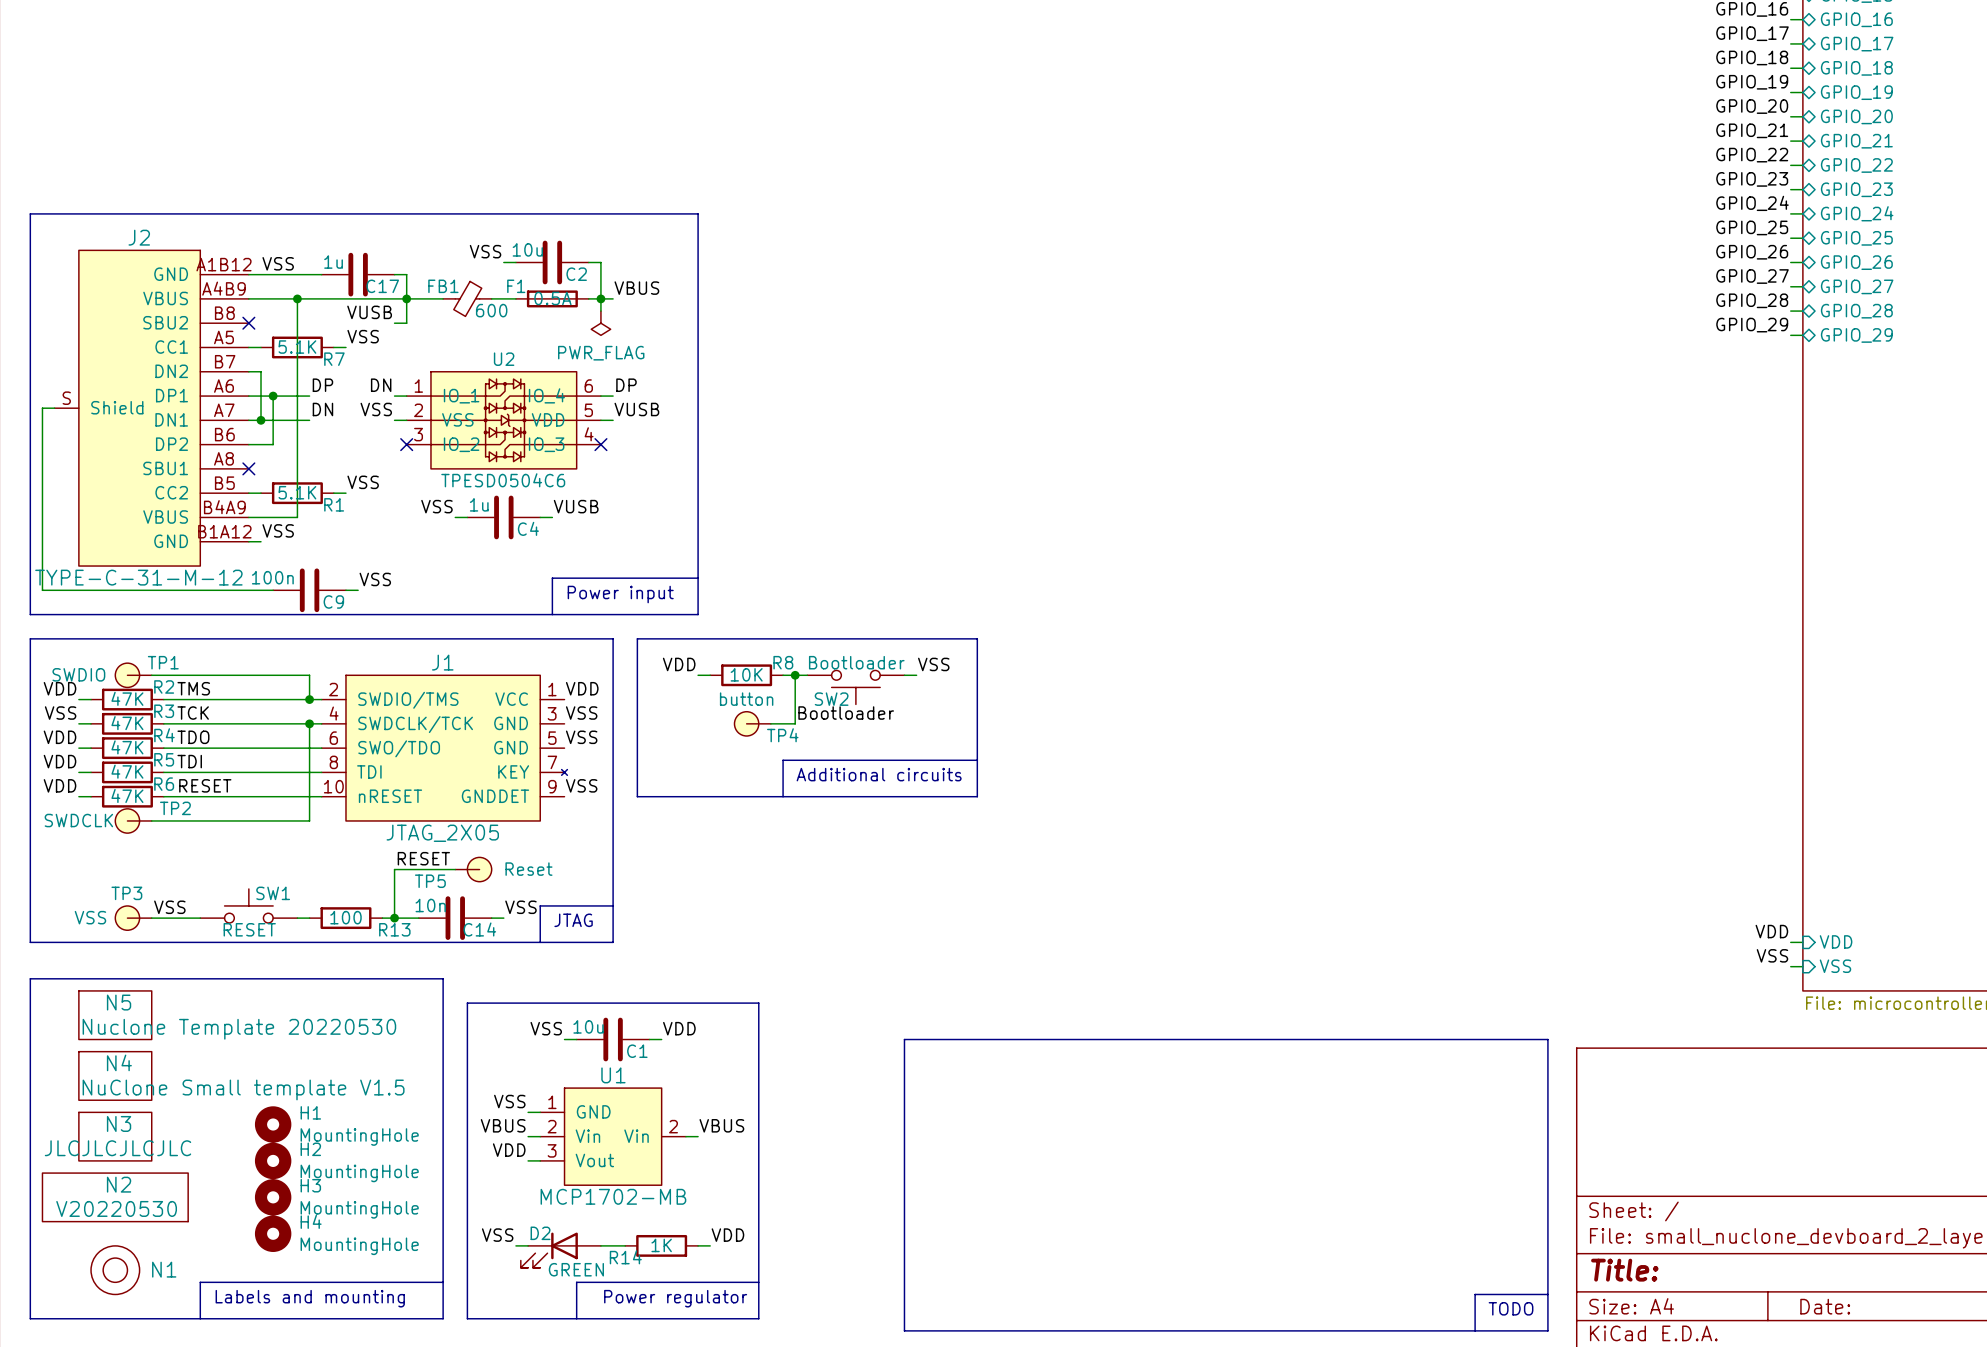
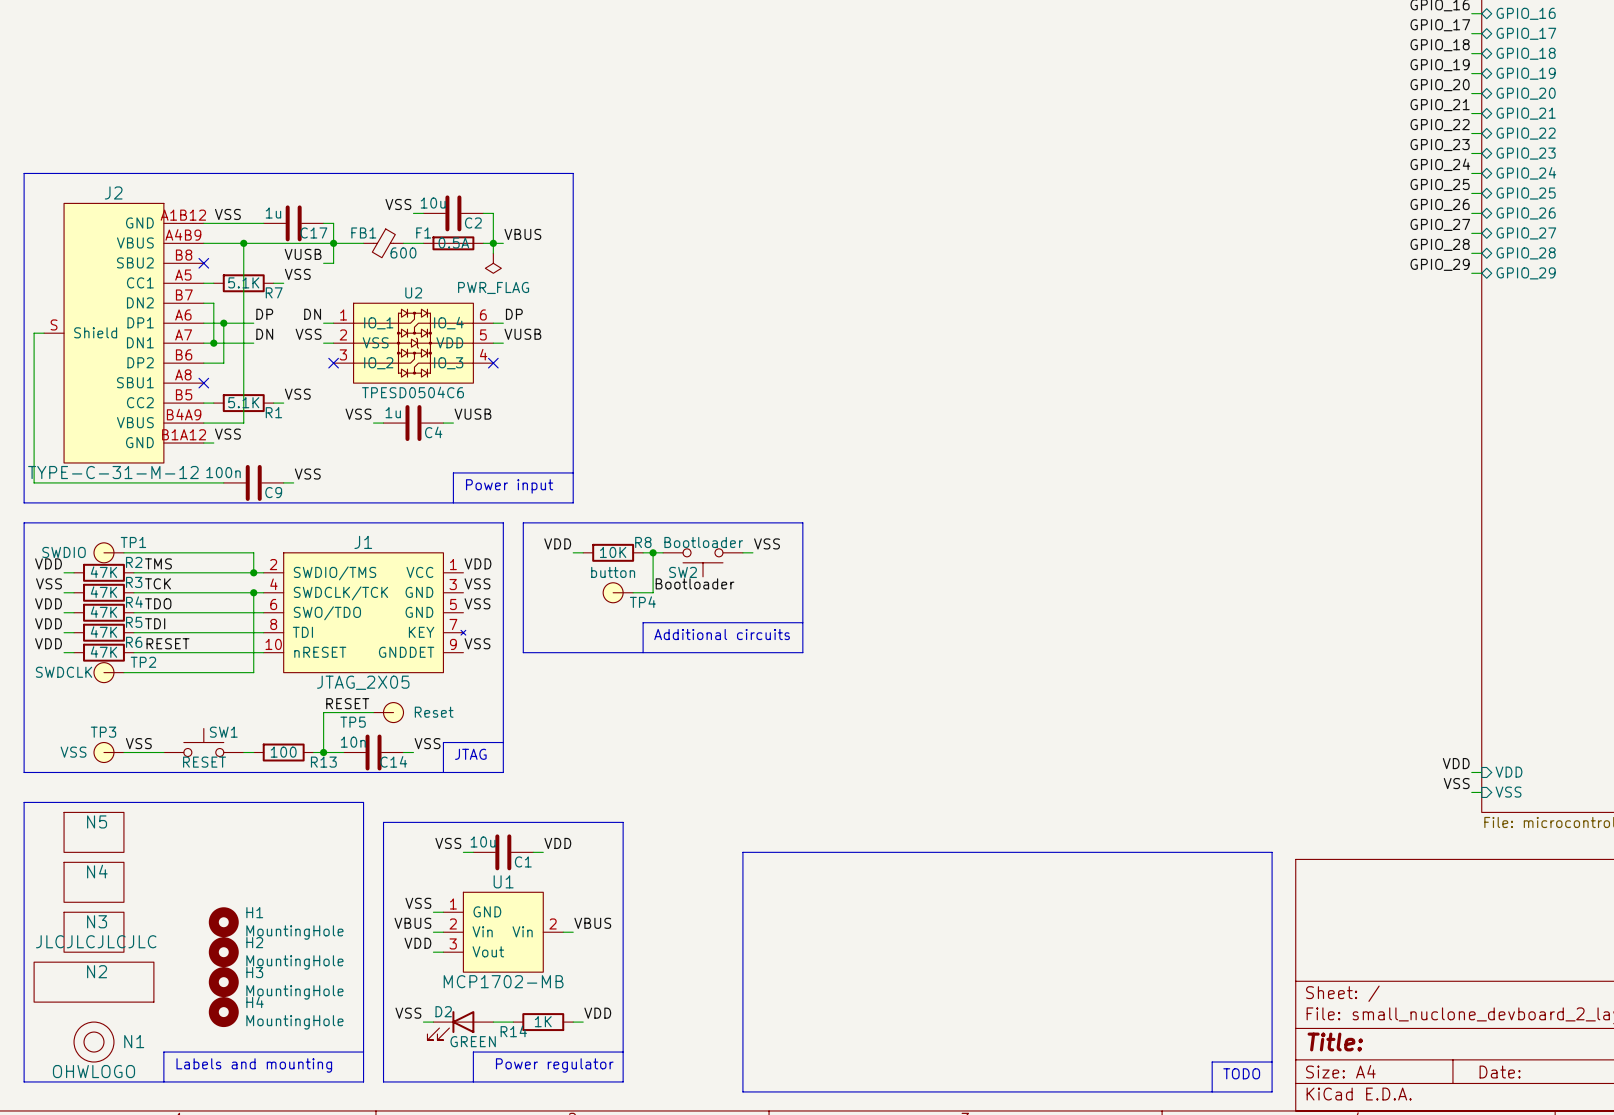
N5 value: Nuclone Template 20220530 (239, 1029) -> none
N4 value: NuClone Small template V1.5 (243, 1089) -> none
N2 value: V20220530 (116, 1208) -> none
N1 value: none -> OHWLOGO (93, 1071)

